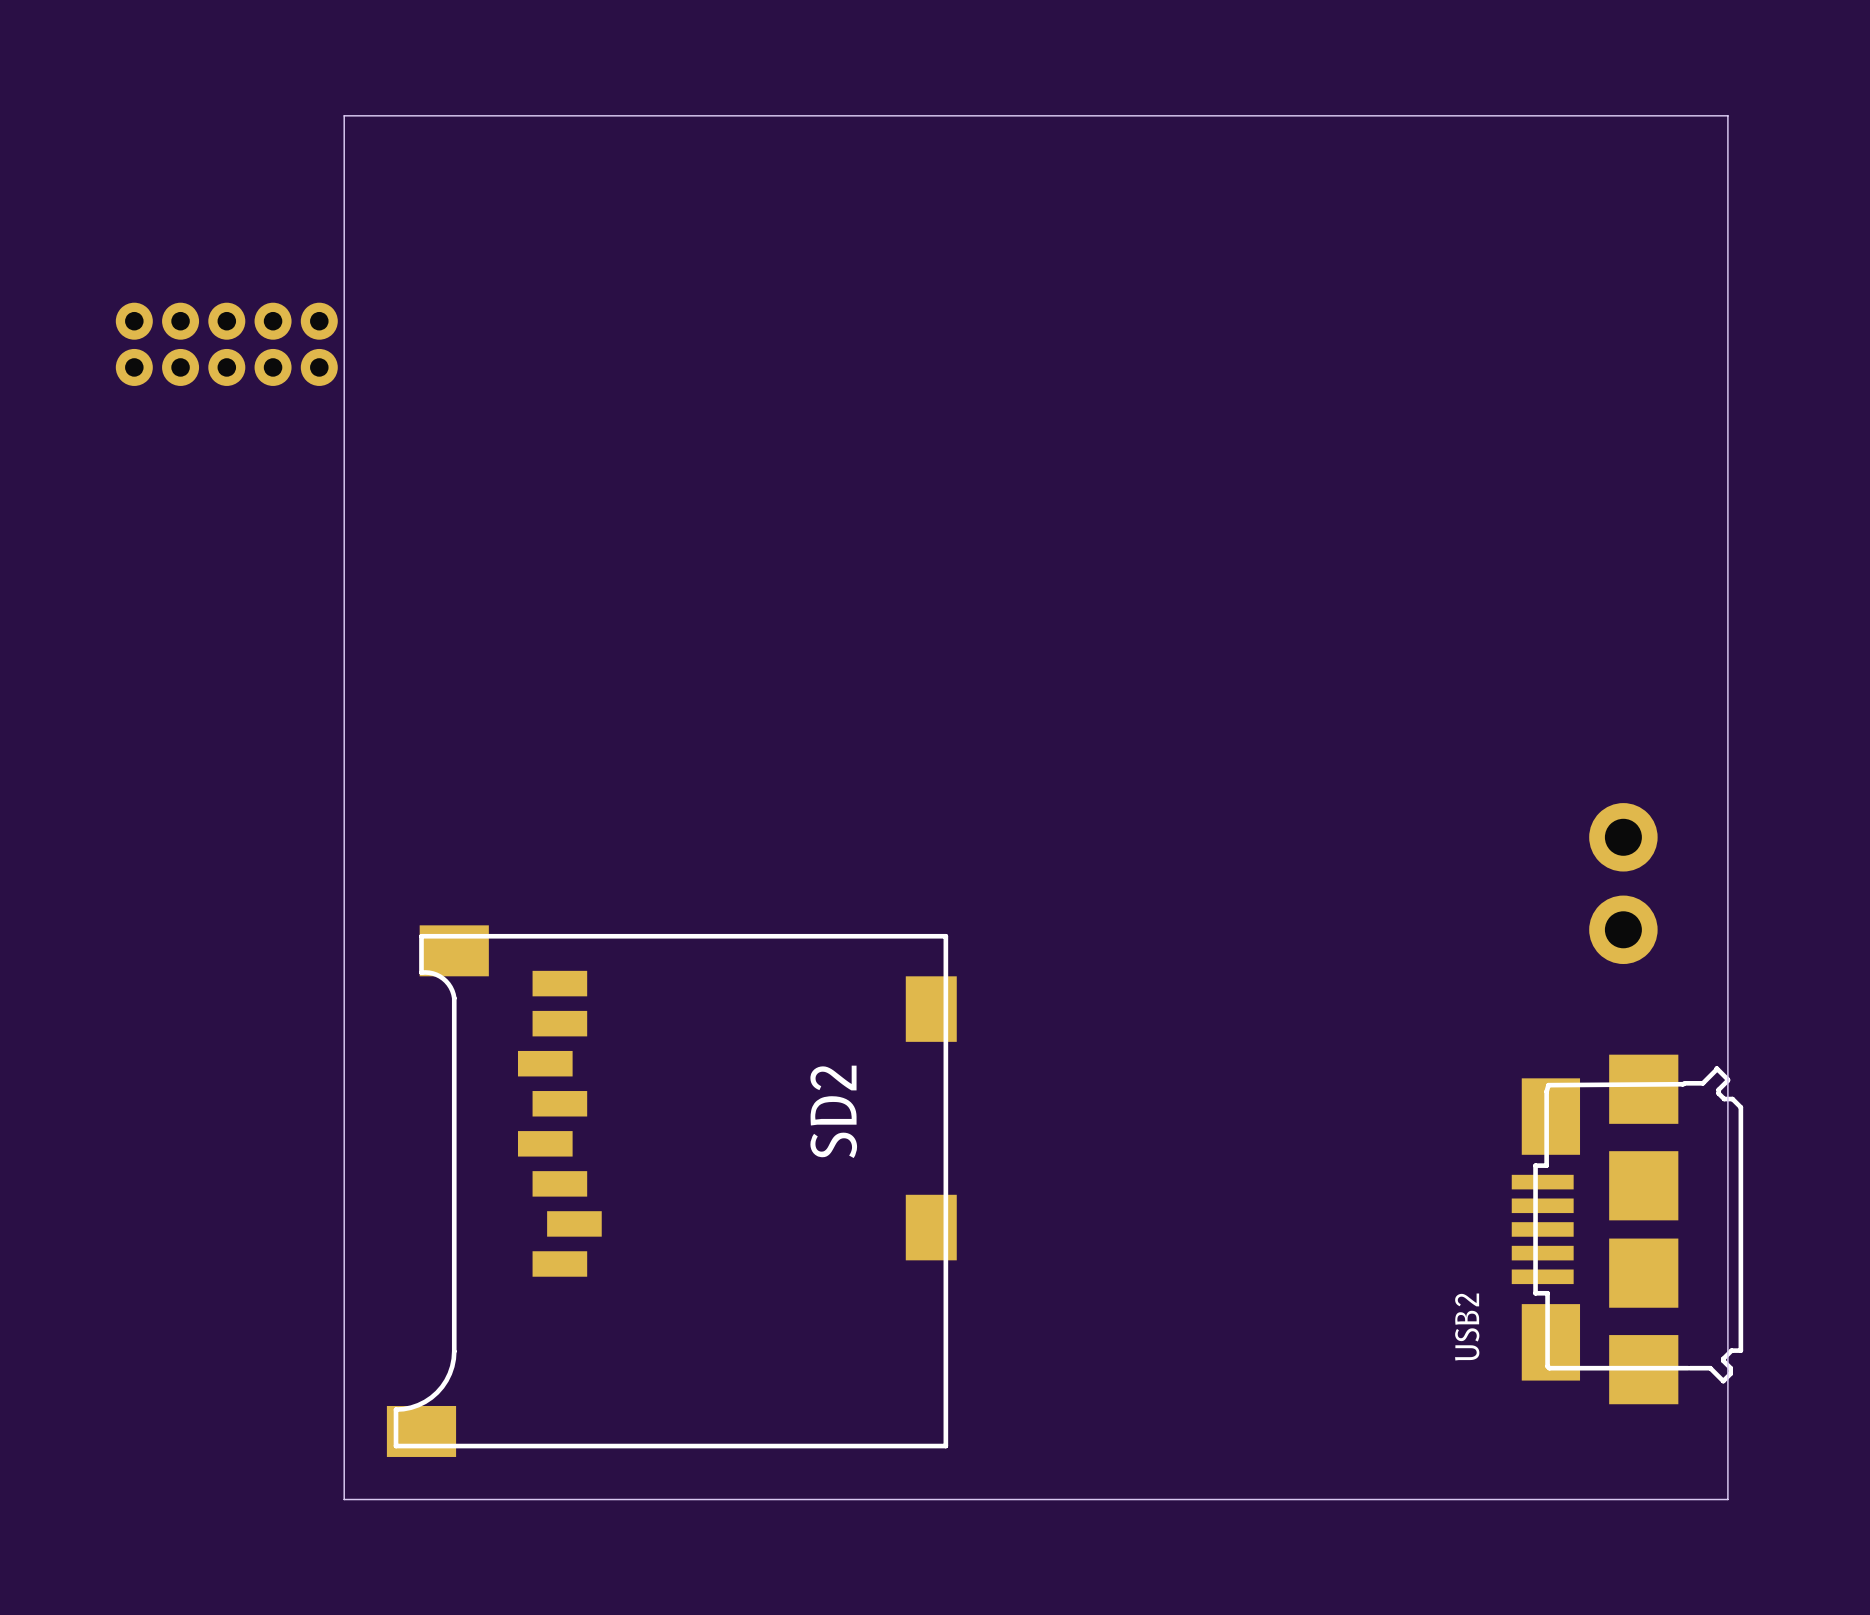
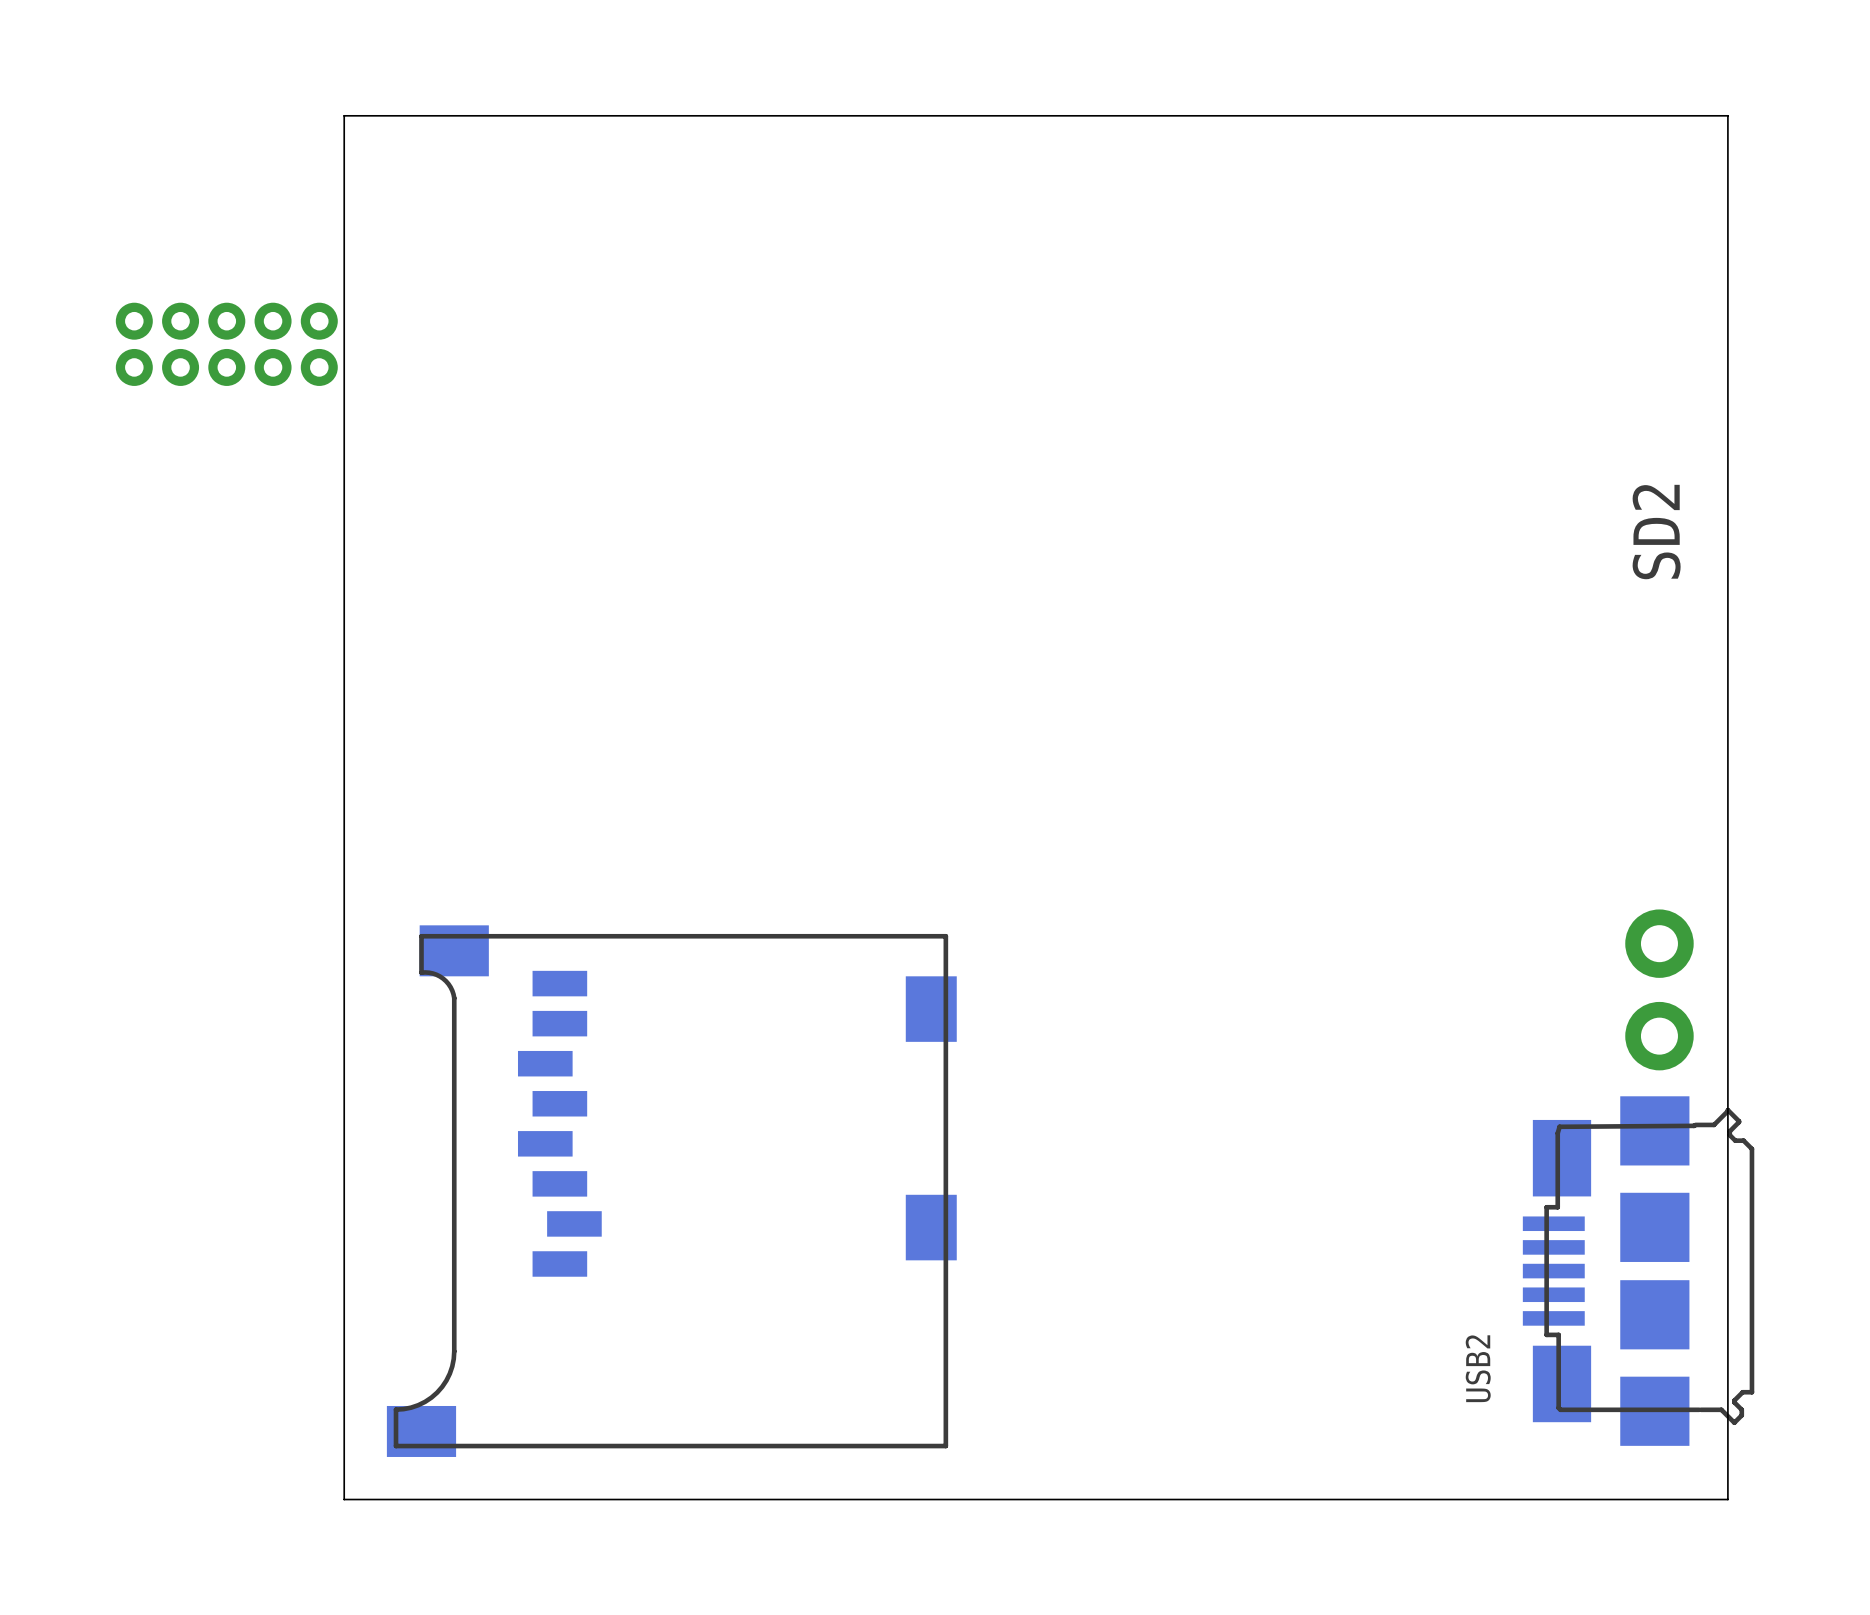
part position: (1623, 883) -> (1659, 989)
SD2 name position: SD2 (833, 1111) -> SD2 (1656, 532)
USB2 position: (1627, 1229) -> (1638, 1271)

